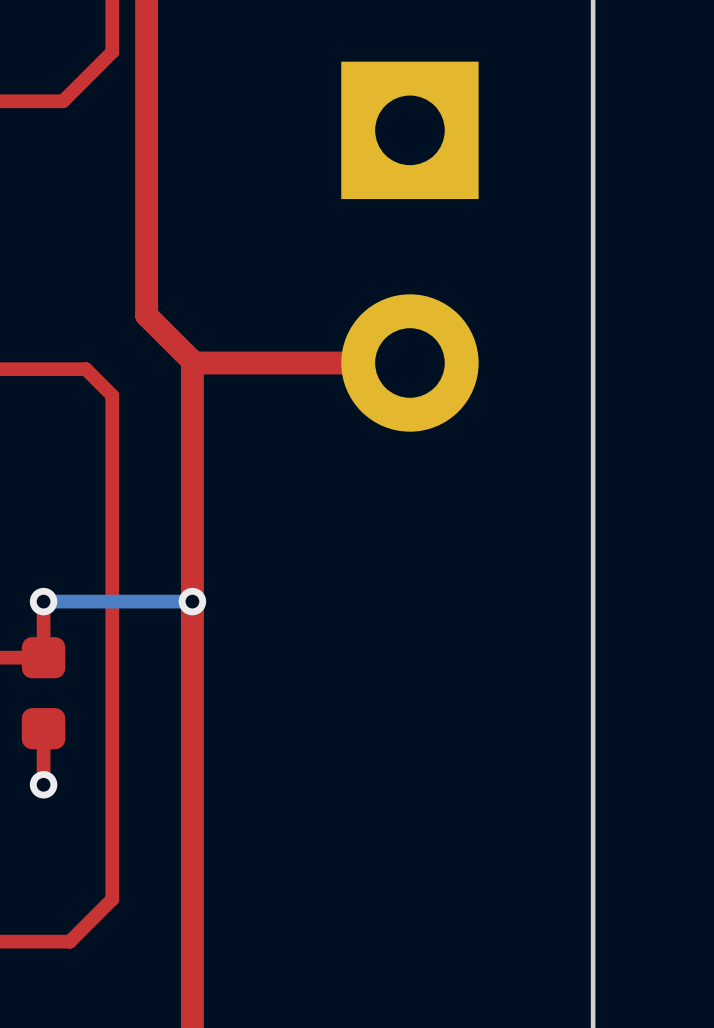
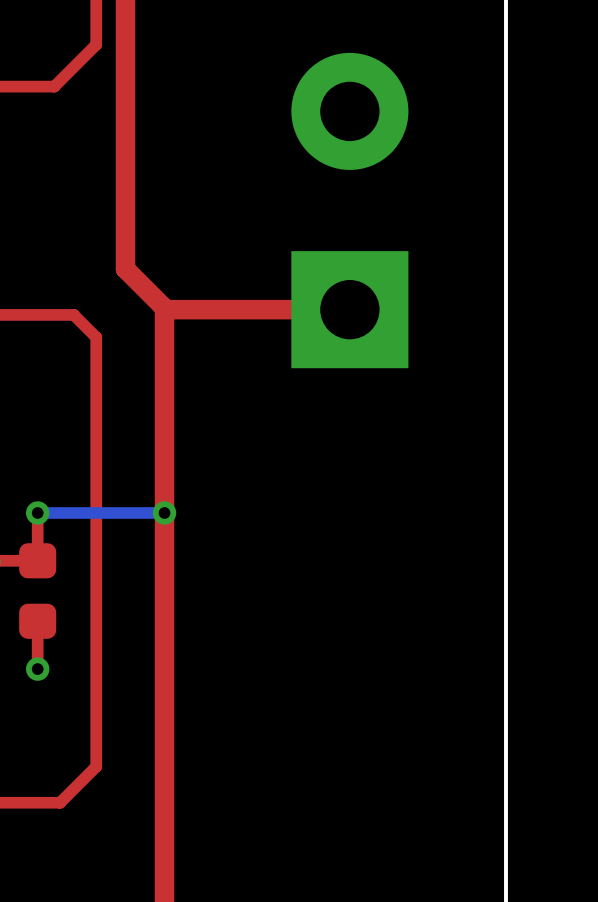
part rotation: 0° (409, 246) -> 180° (349, 210)

